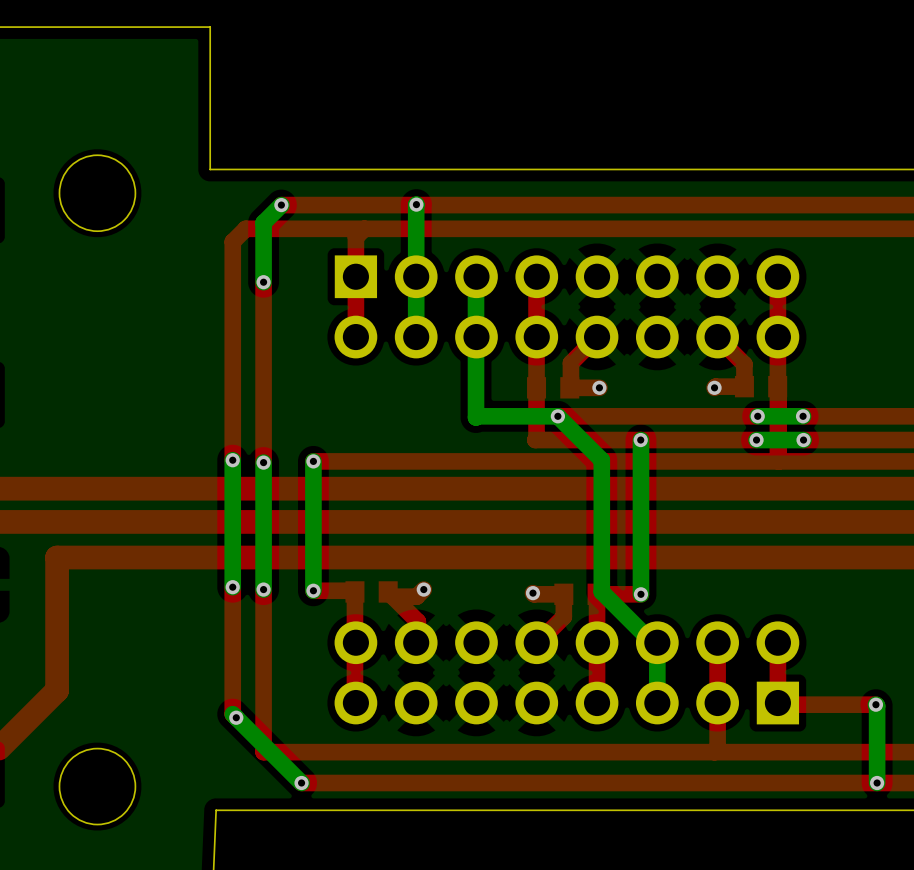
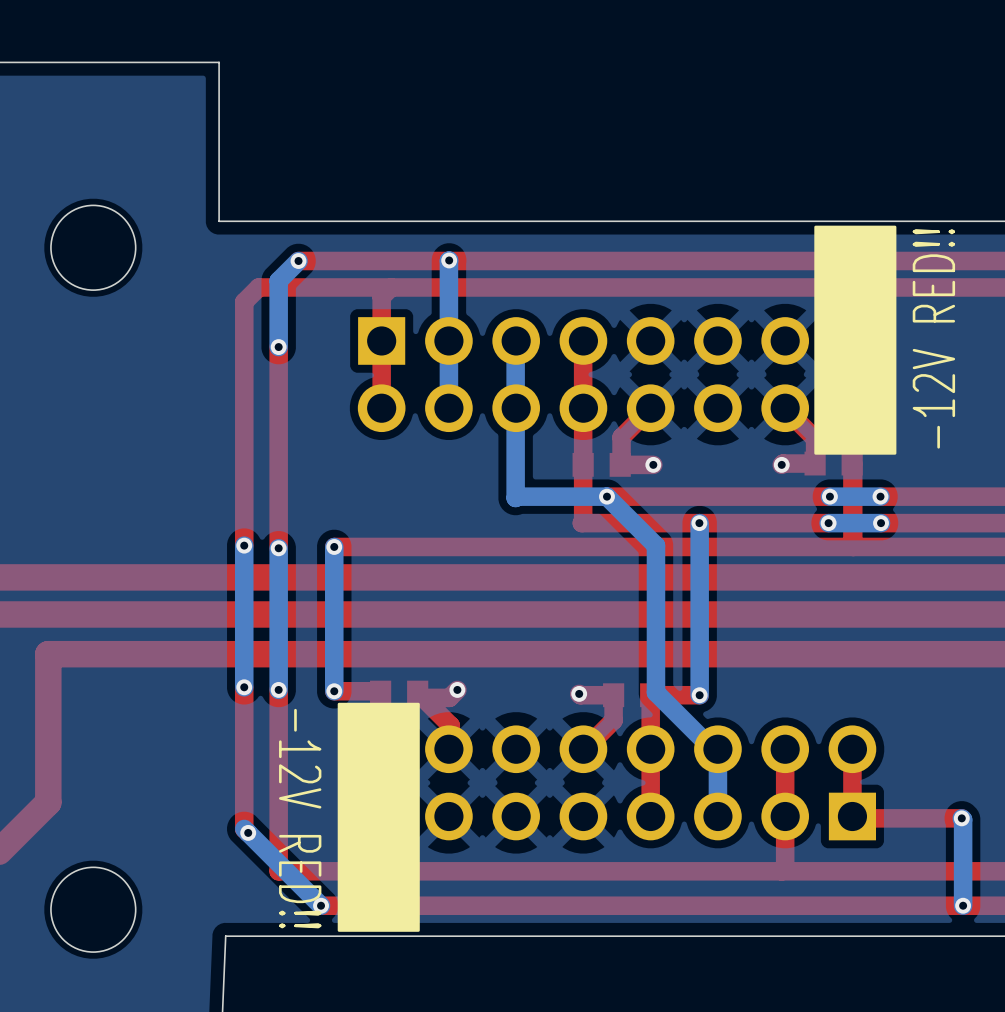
part: none -> (627, 340)
part: (566, 306) -> none
part: (566, 672) -> none
part: none -> (606, 817)

